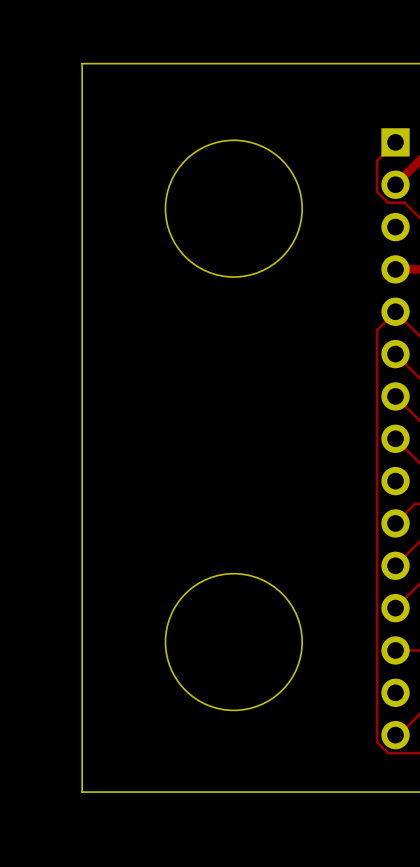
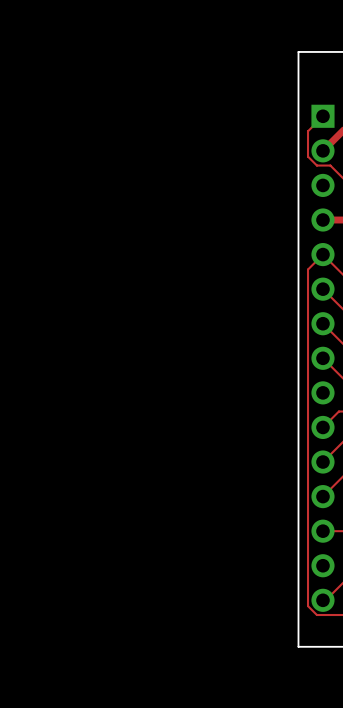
board edge: (365, 63) (82, 63) (82, 792) (365, 792) -> (298, 51) (298, 646)
round board edge: [164, 139, 304, 278] -> none
round board edge: [164, 572, 304, 712] -> none

